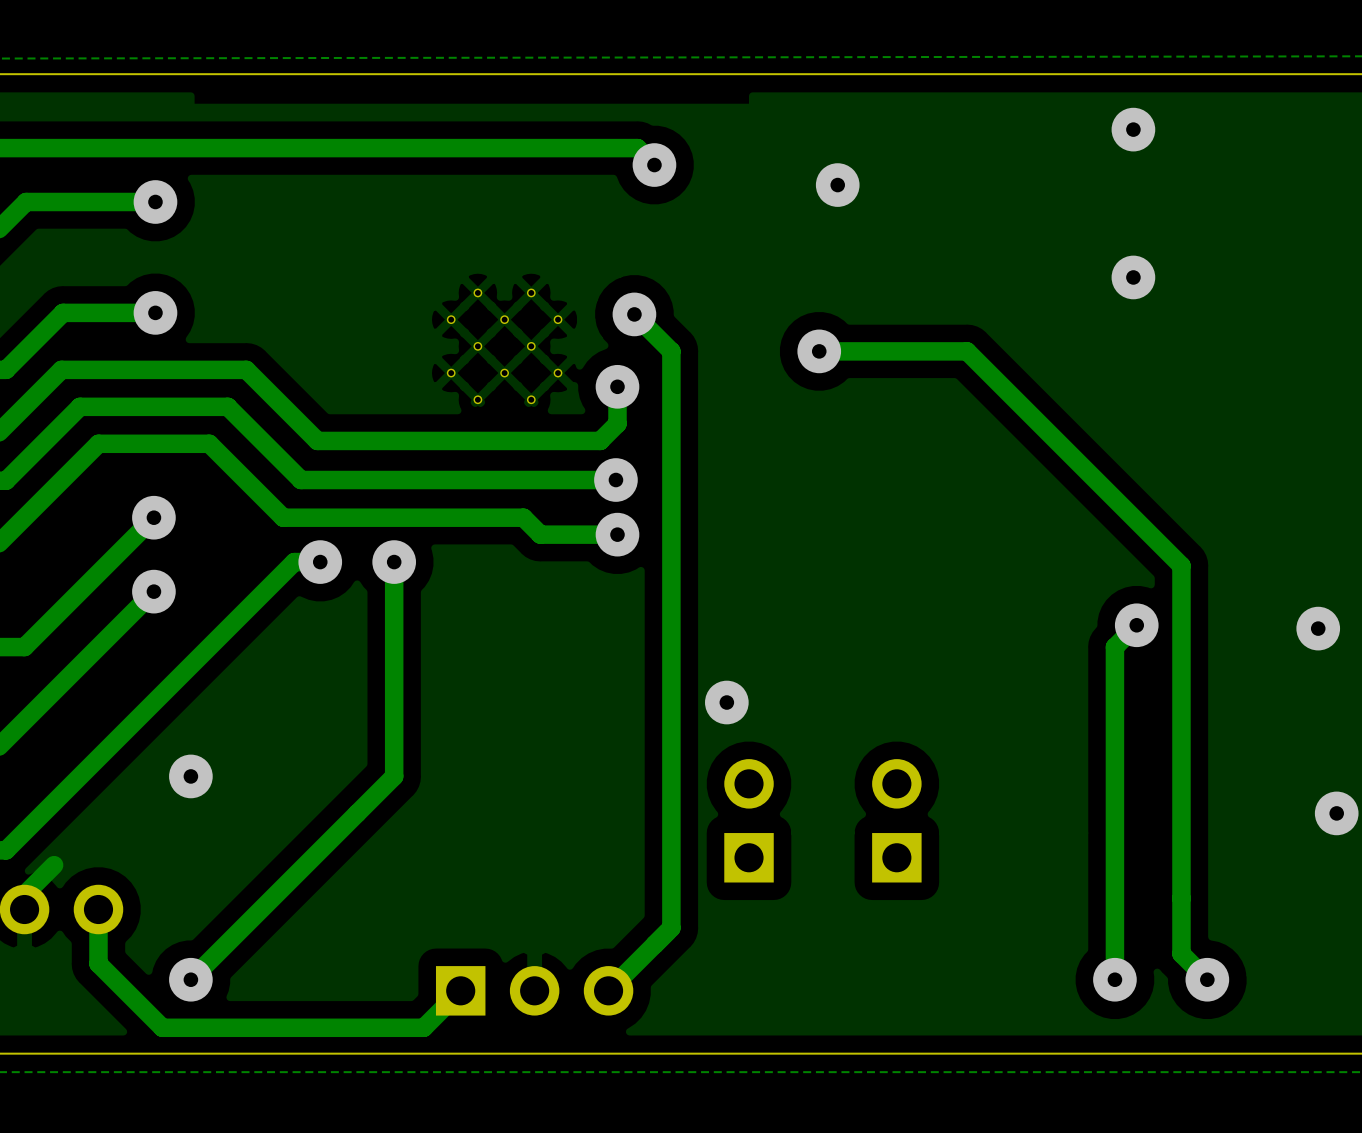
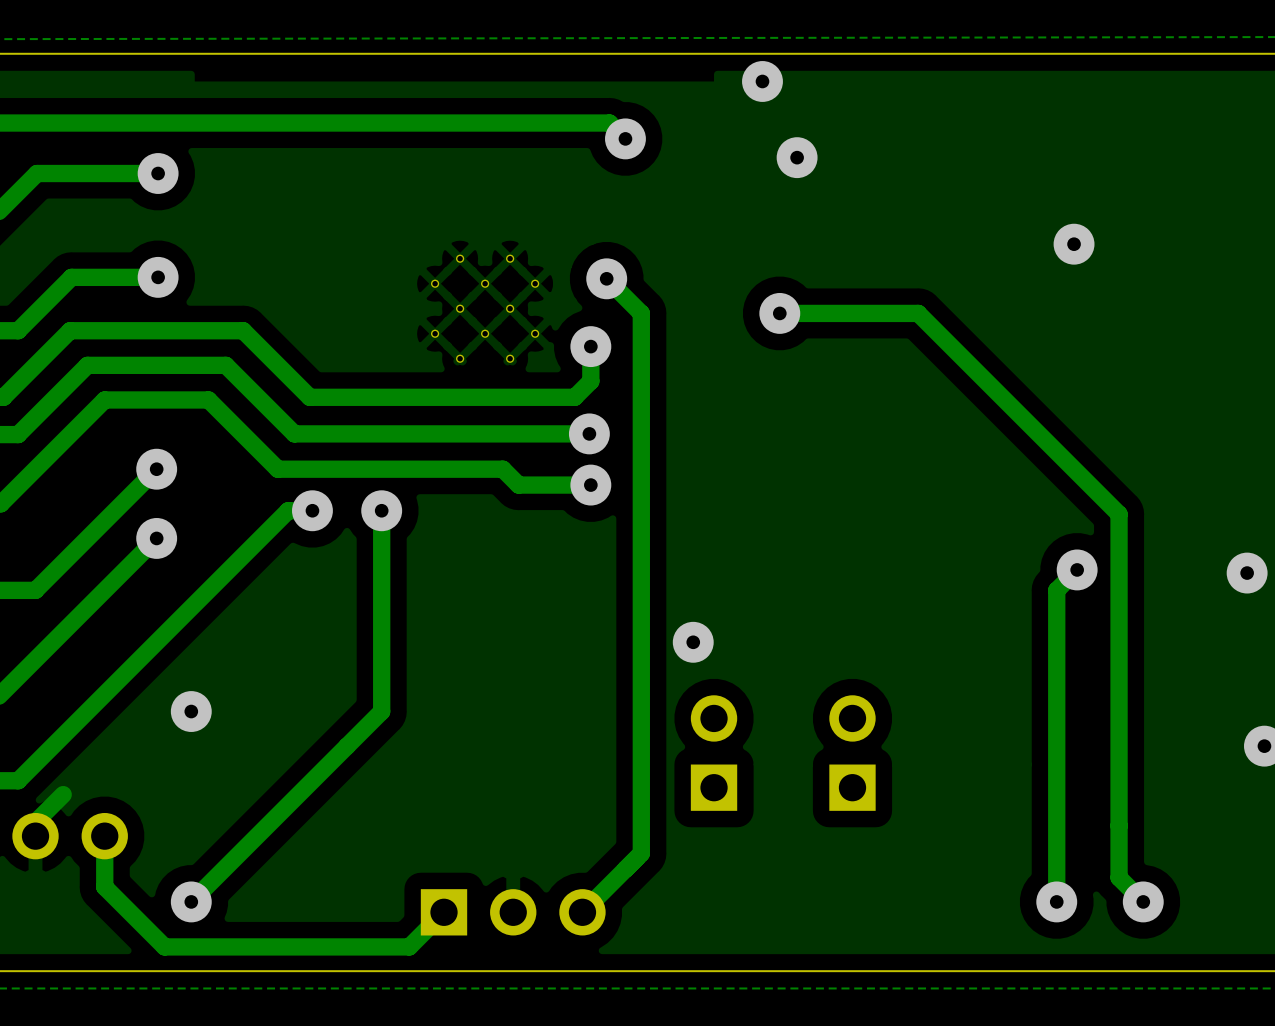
via: none -> (762, 81)
via: (1133, 129) -> none

